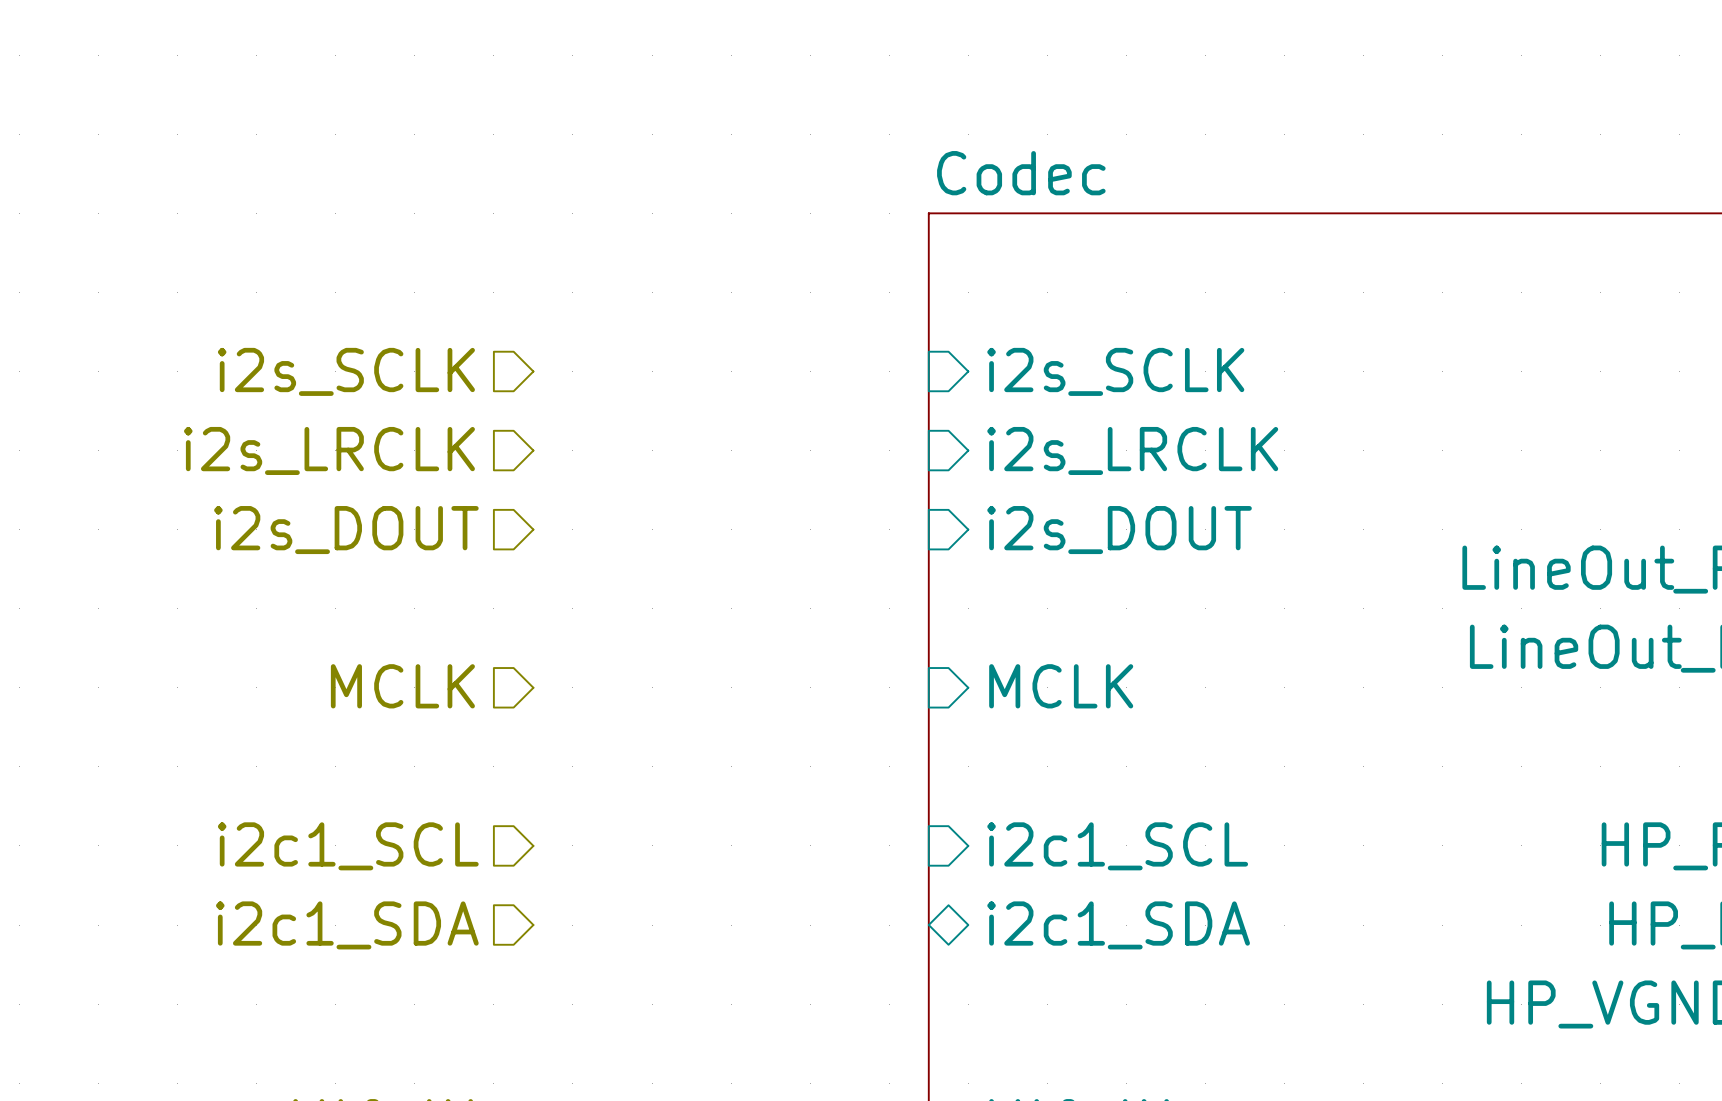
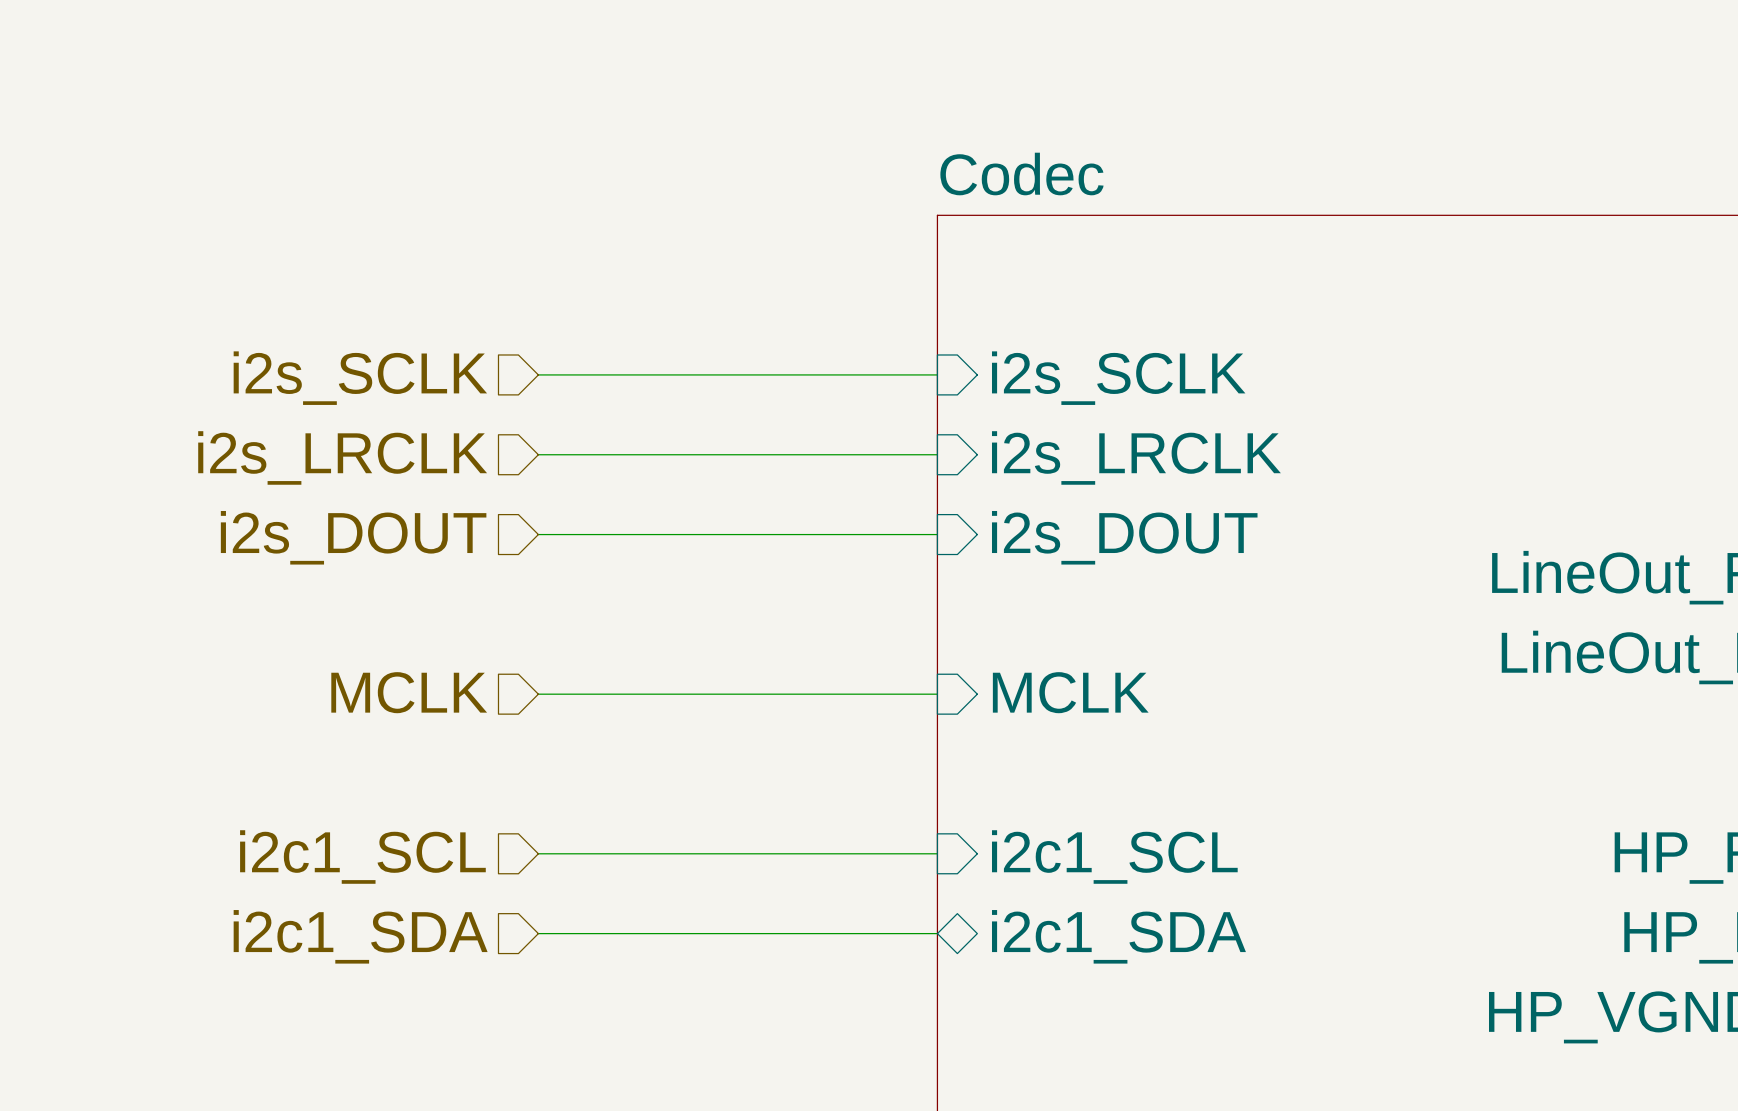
wire: none -> (538, 374) (937, 374)
wire: none -> (538, 454) (937, 454)
wire: none -> (538, 534) (937, 534)
wire: none -> (538, 694) (937, 694)
wire: none -> (538, 853) (937, 853)
wire: none -> (538, 933) (937, 933)

